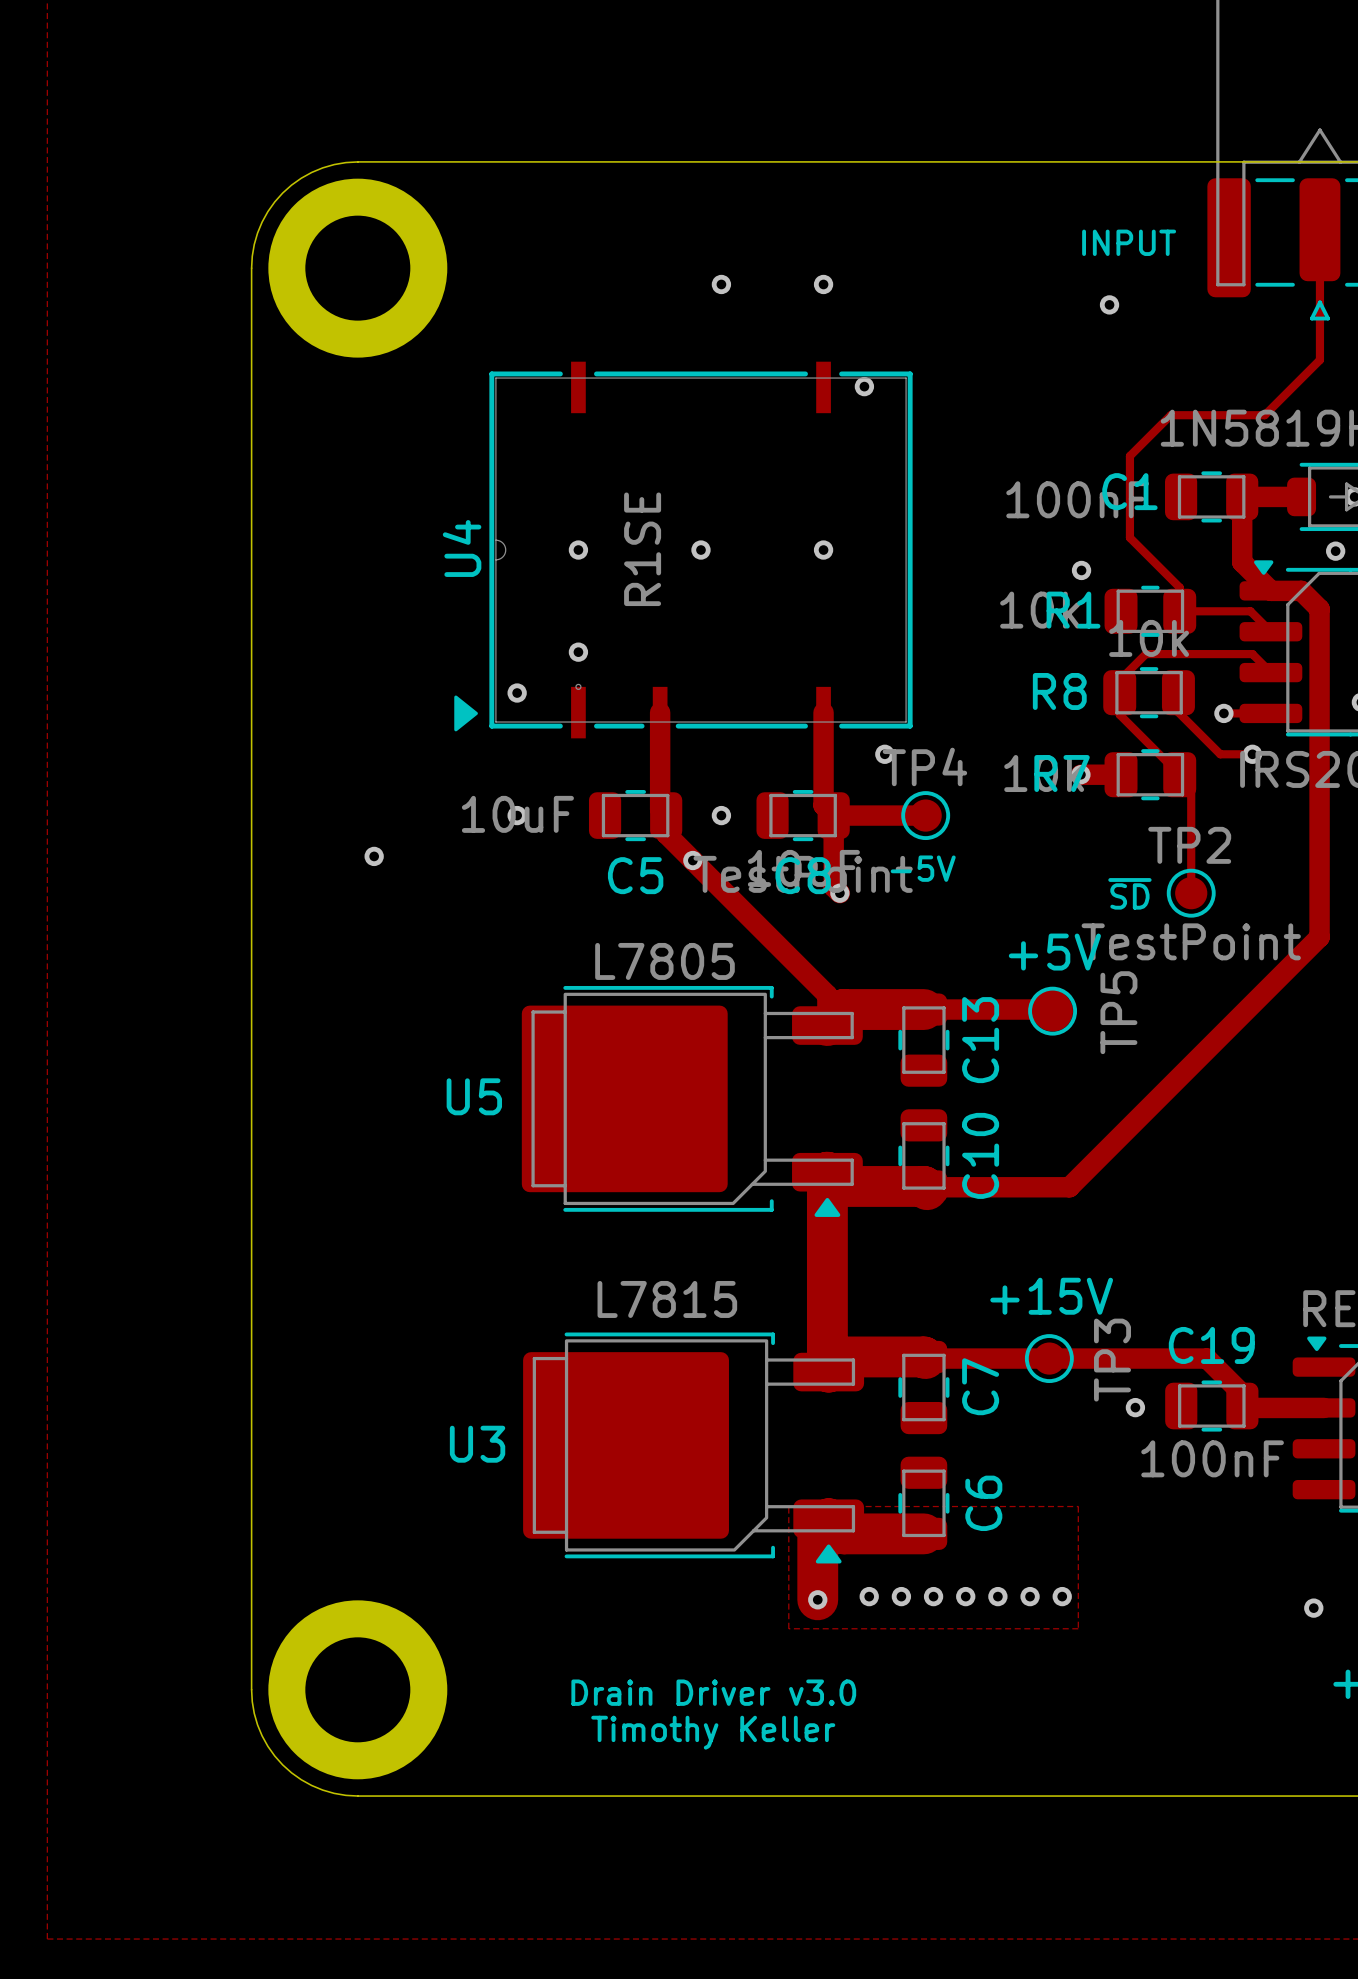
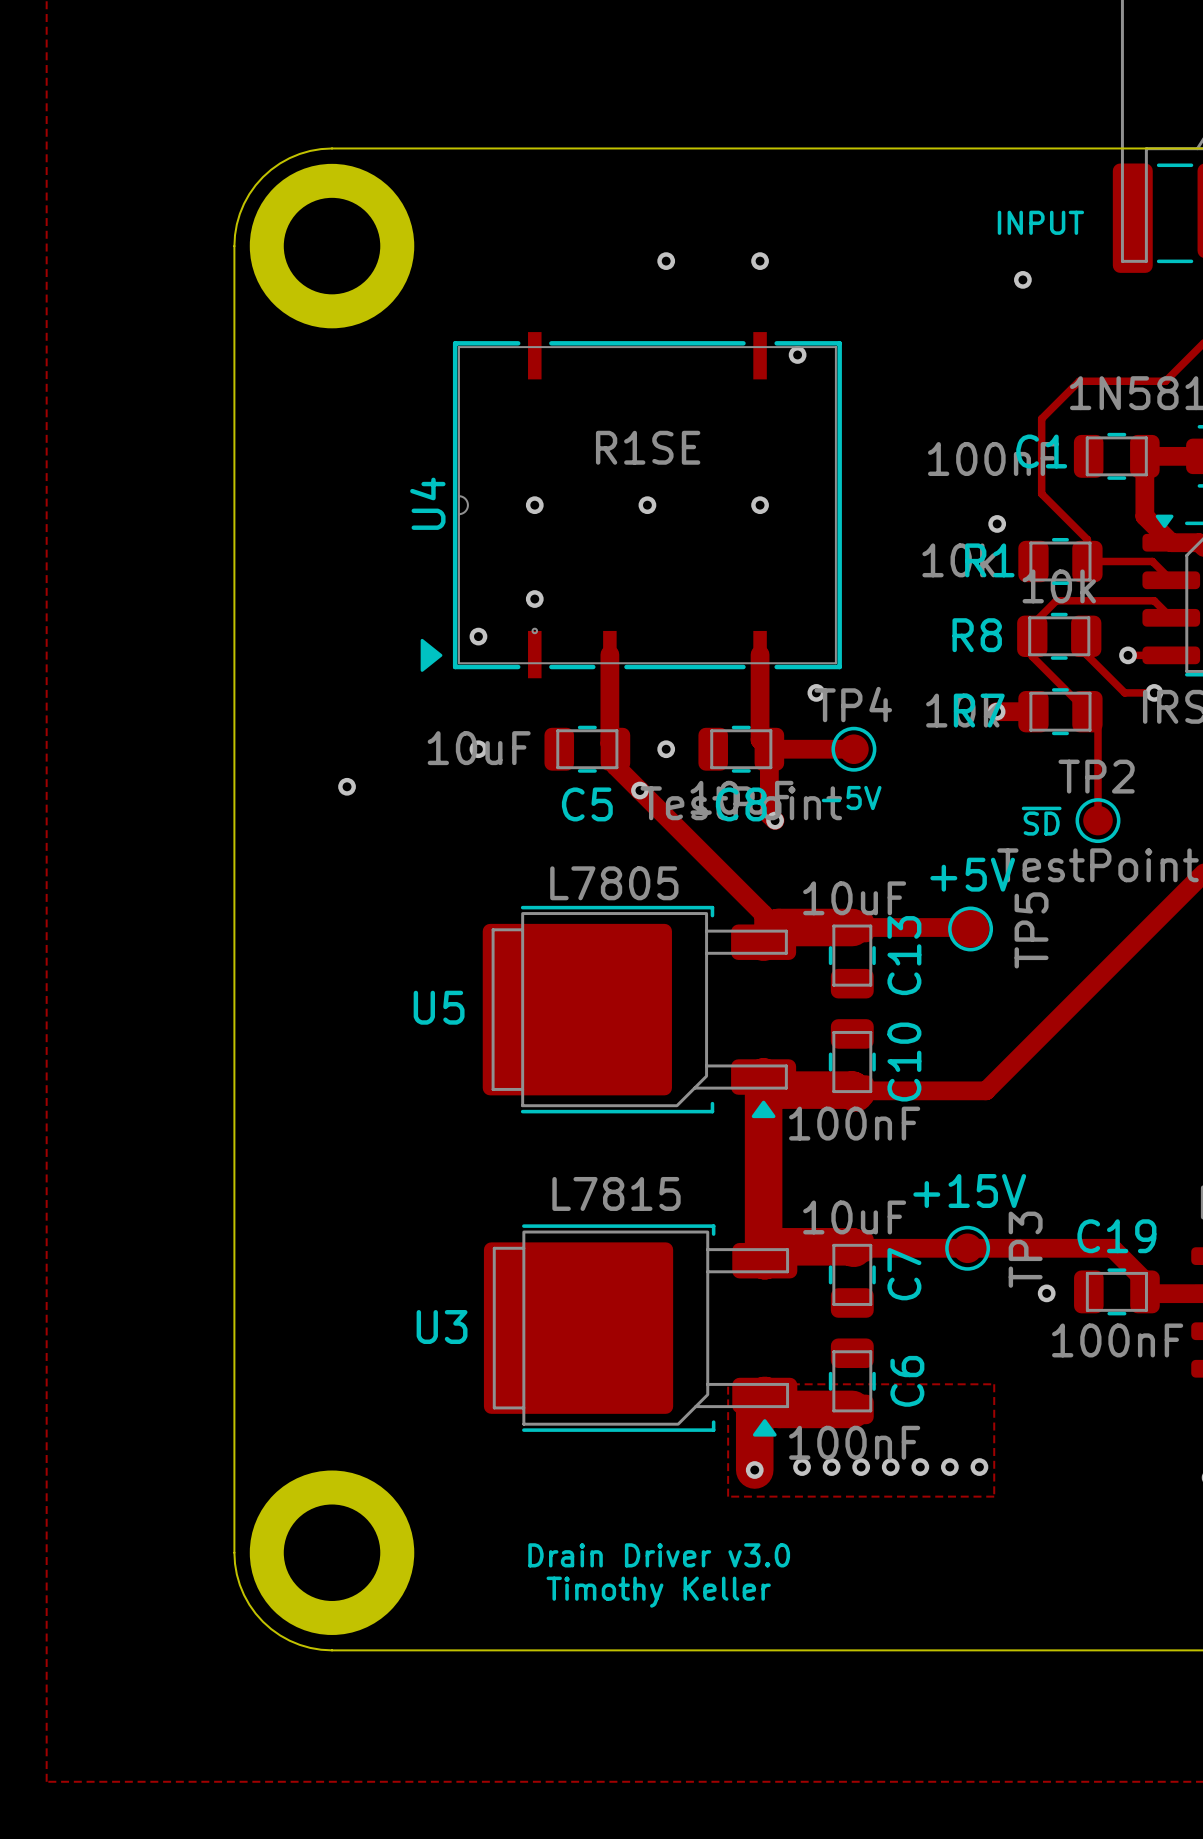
U4 value rotation: 0° (642, 549) -> 90° clockwise (648, 447)
C13 value: none -> 10uF (854, 898)
C10 value: none -> 100nF (854, 1123)
C7 value: none -> 10uF (854, 1217)
C6 value: none -> 100nF (854, 1442)

